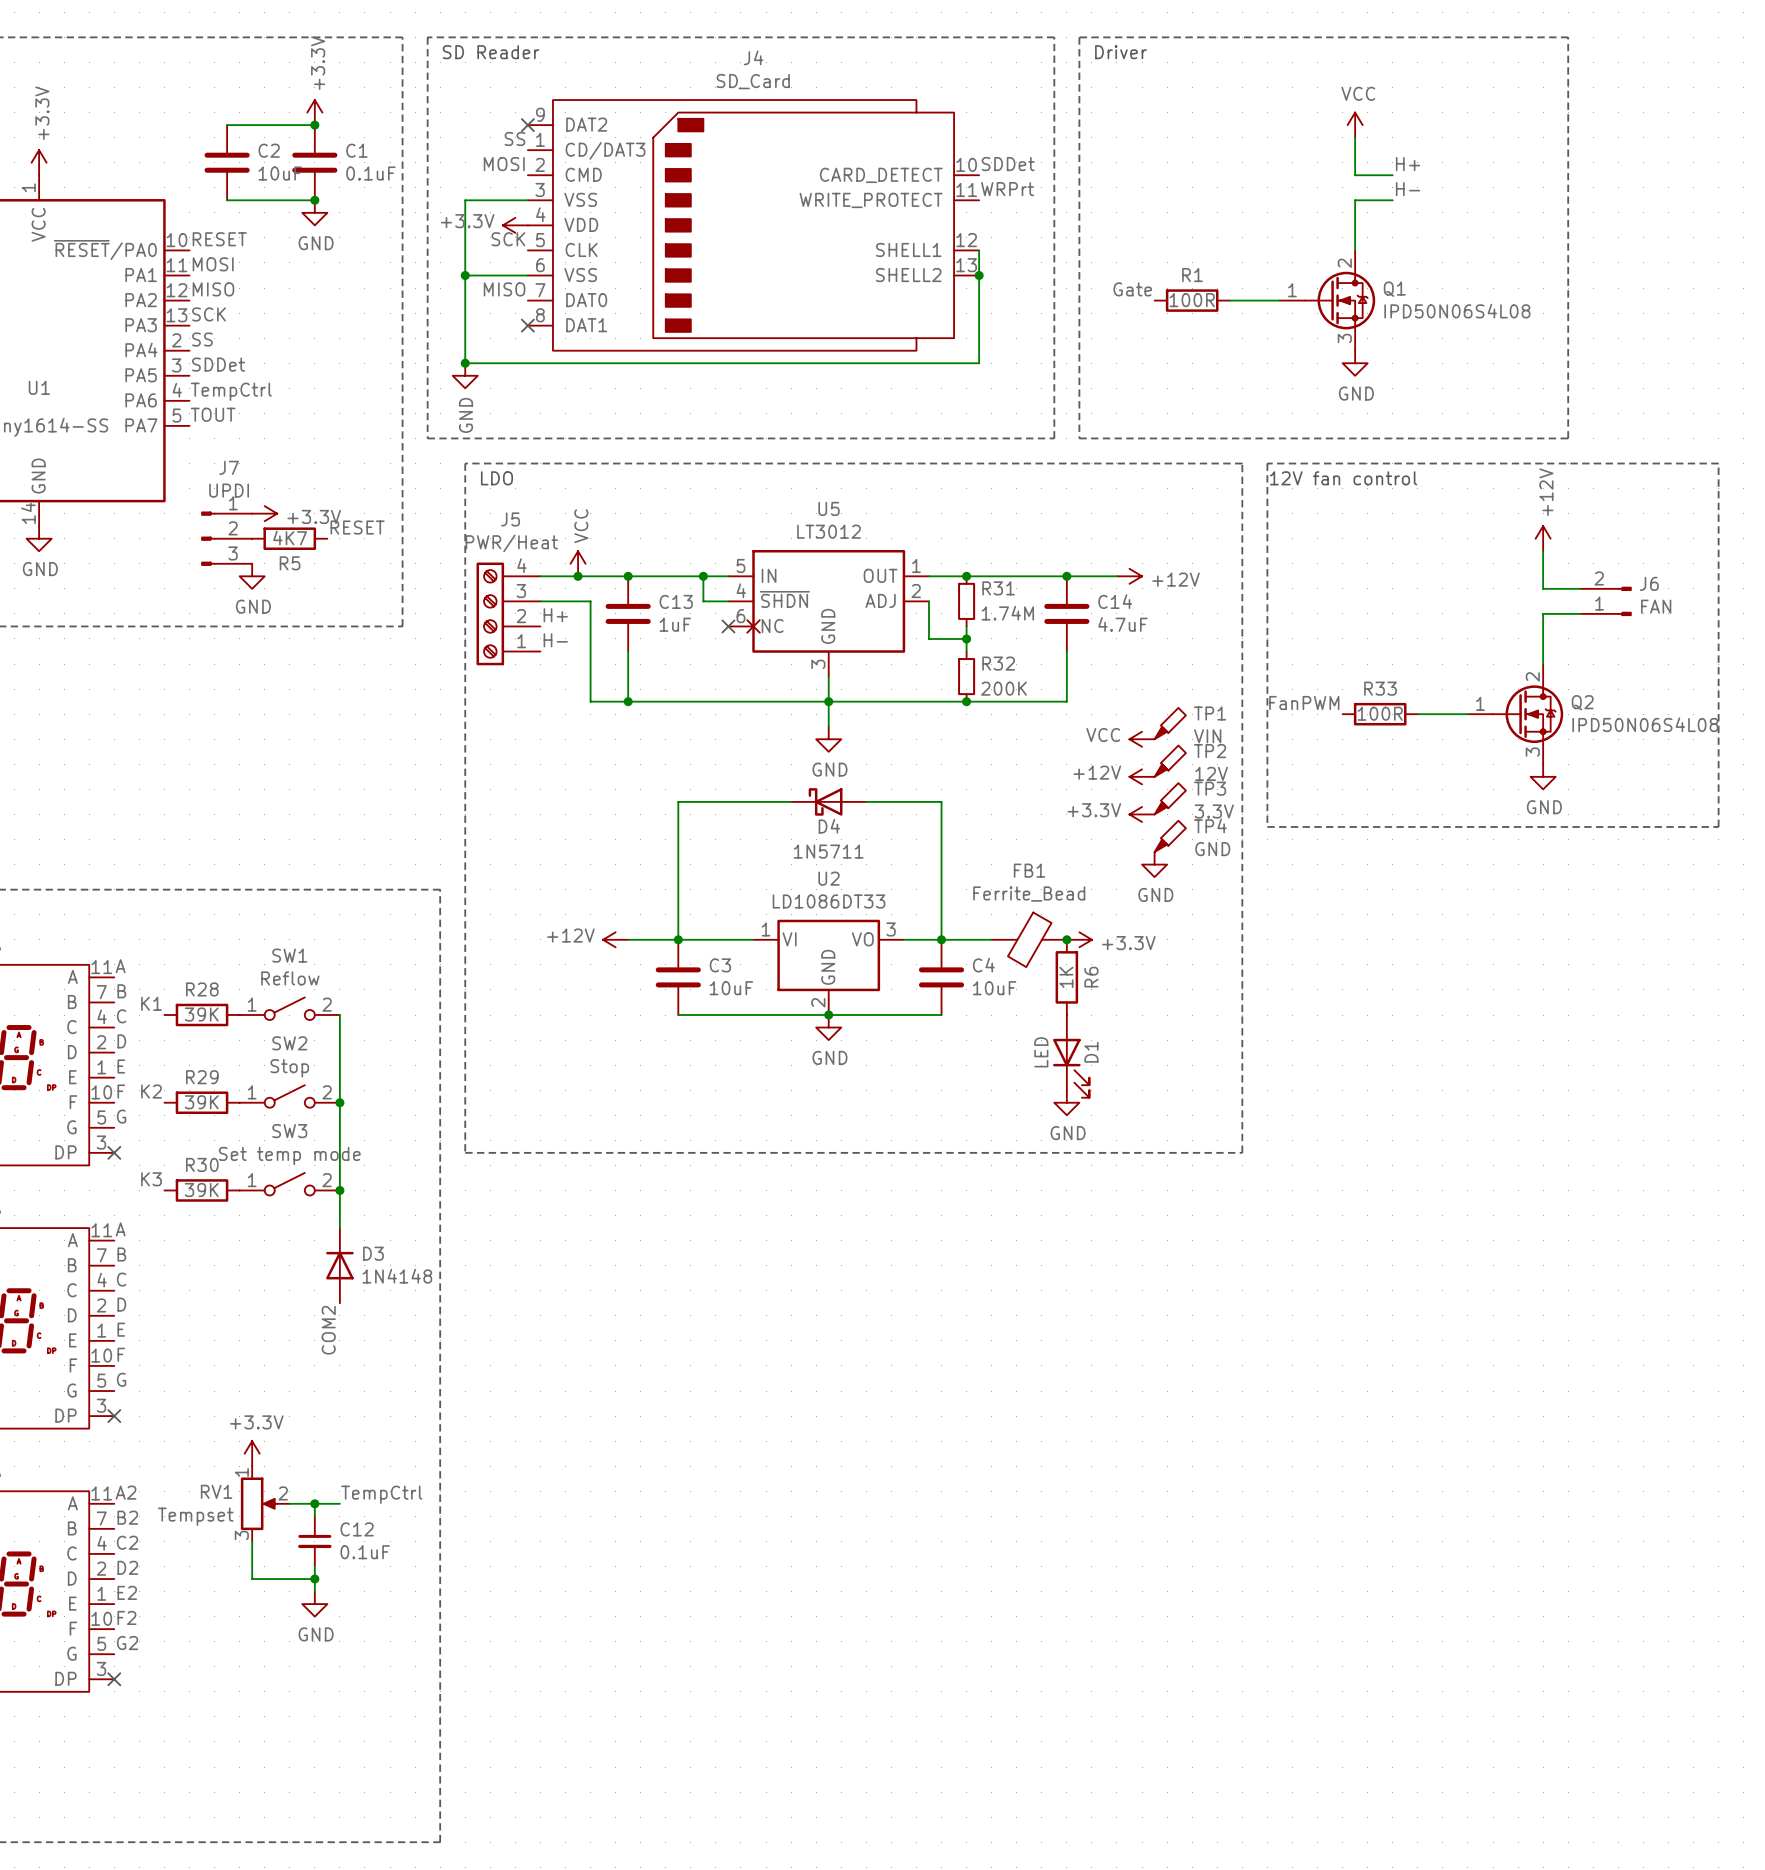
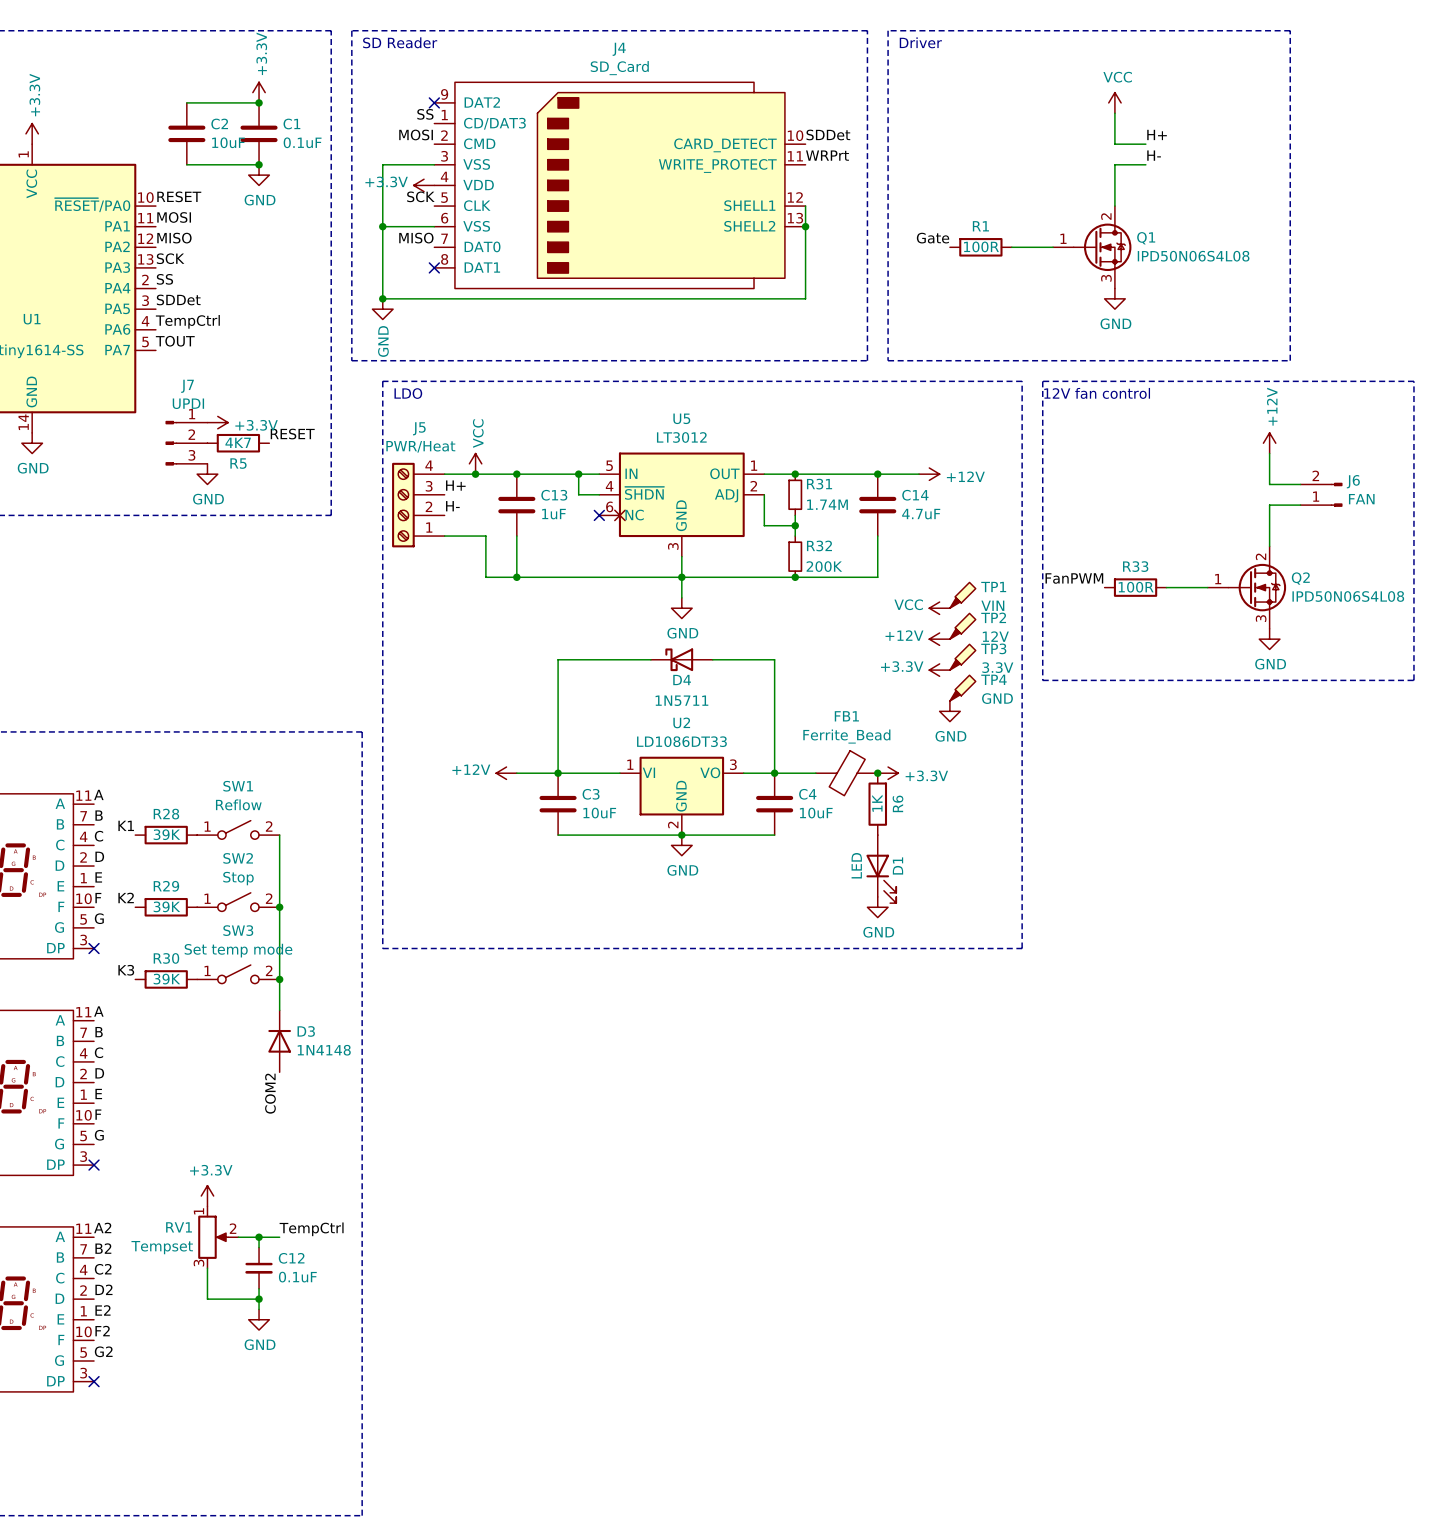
label: none -> H+ (455, 485)
wire: (540, 601) (590, 601) (590, 651) -> (444, 536) (485, 536)
label: H+ (555, 615) -> H- (452, 506)
label: H- (555, 640) -> none

